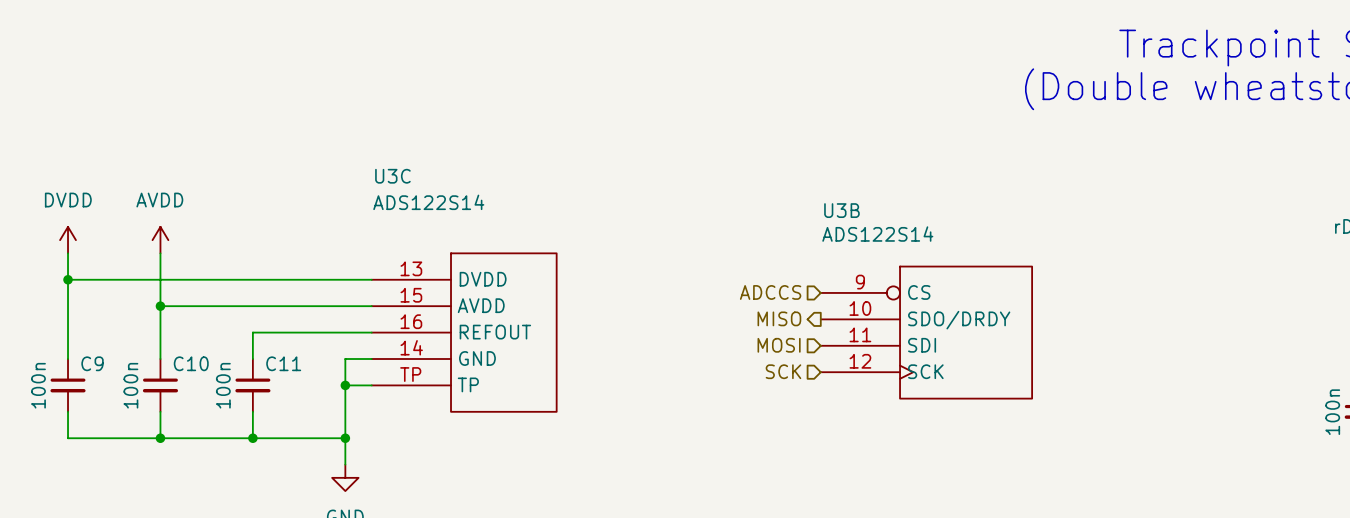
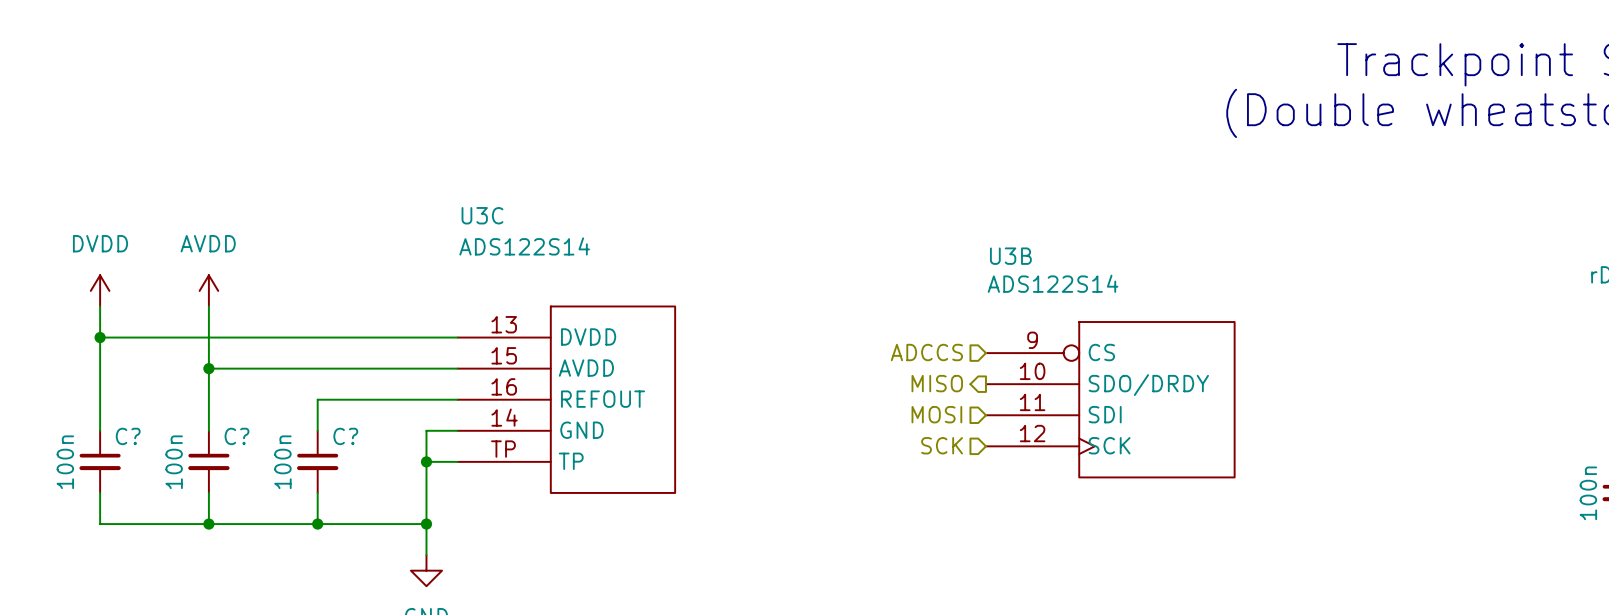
C9 name: C9 (92, 363) -> C? (128, 436)
C10 name: C10 (191, 363) -> C? (237, 436)
C11 name: C11 (283, 363) -> C? (345, 436)

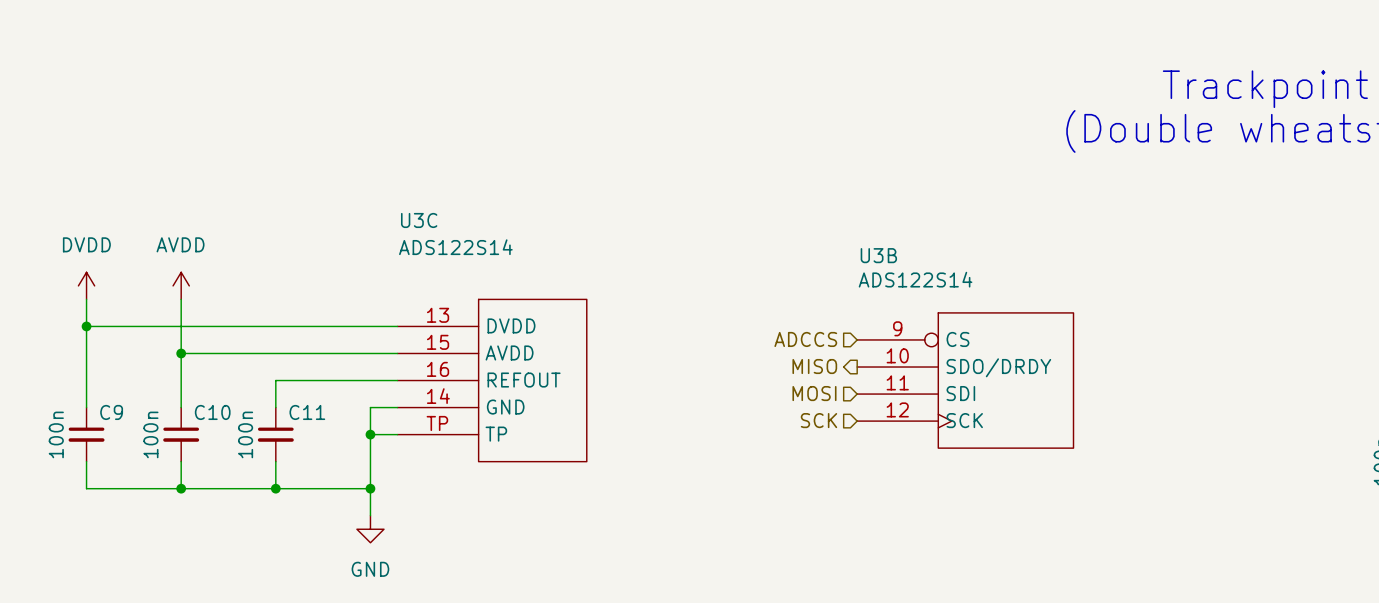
C? name: C? (128, 436) -> C9 (111, 412)
C? name: C? (237, 436) -> C10 (212, 412)
C? name: C? (345, 436) -> C11 (307, 412)

